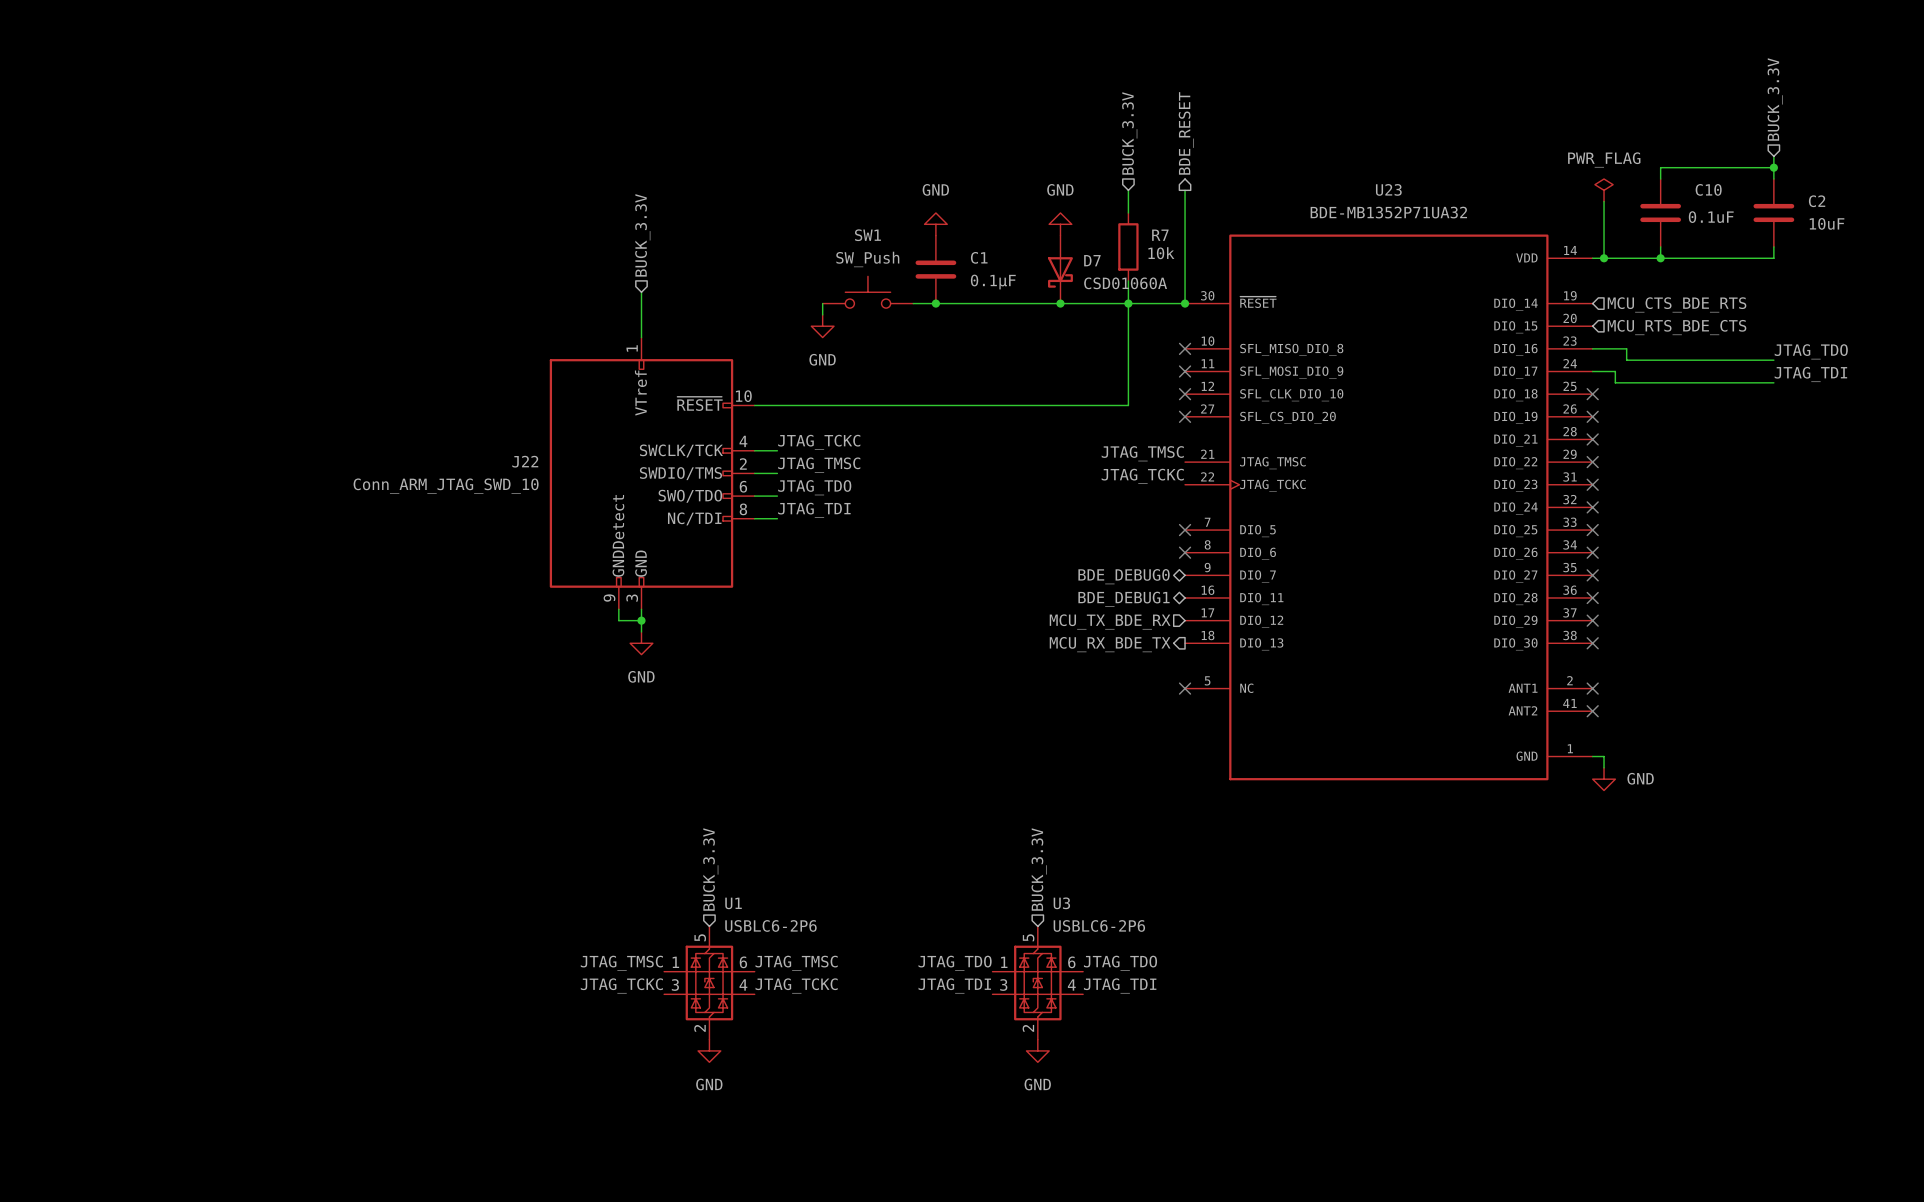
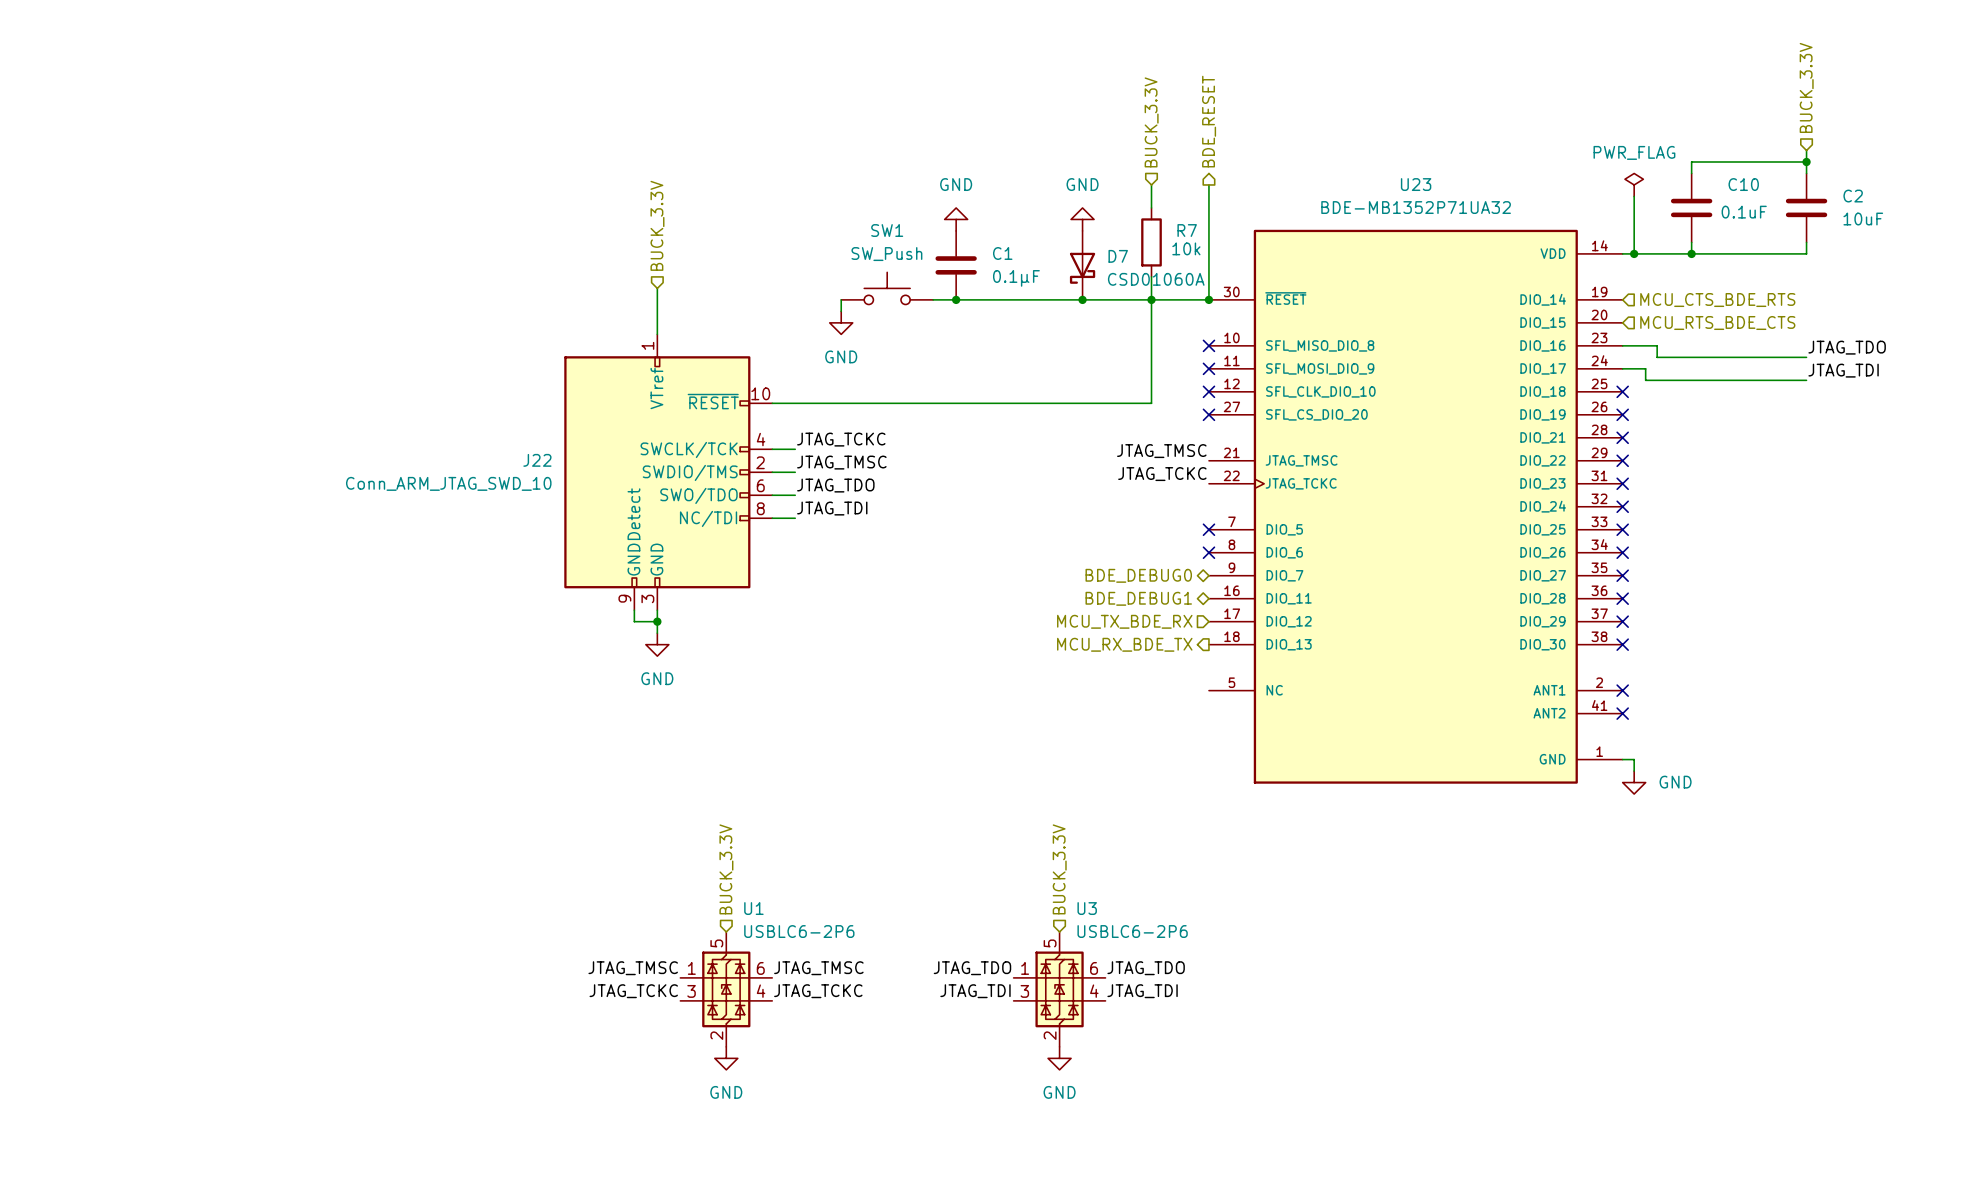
no-connect mark: (1185, 688) -> none

